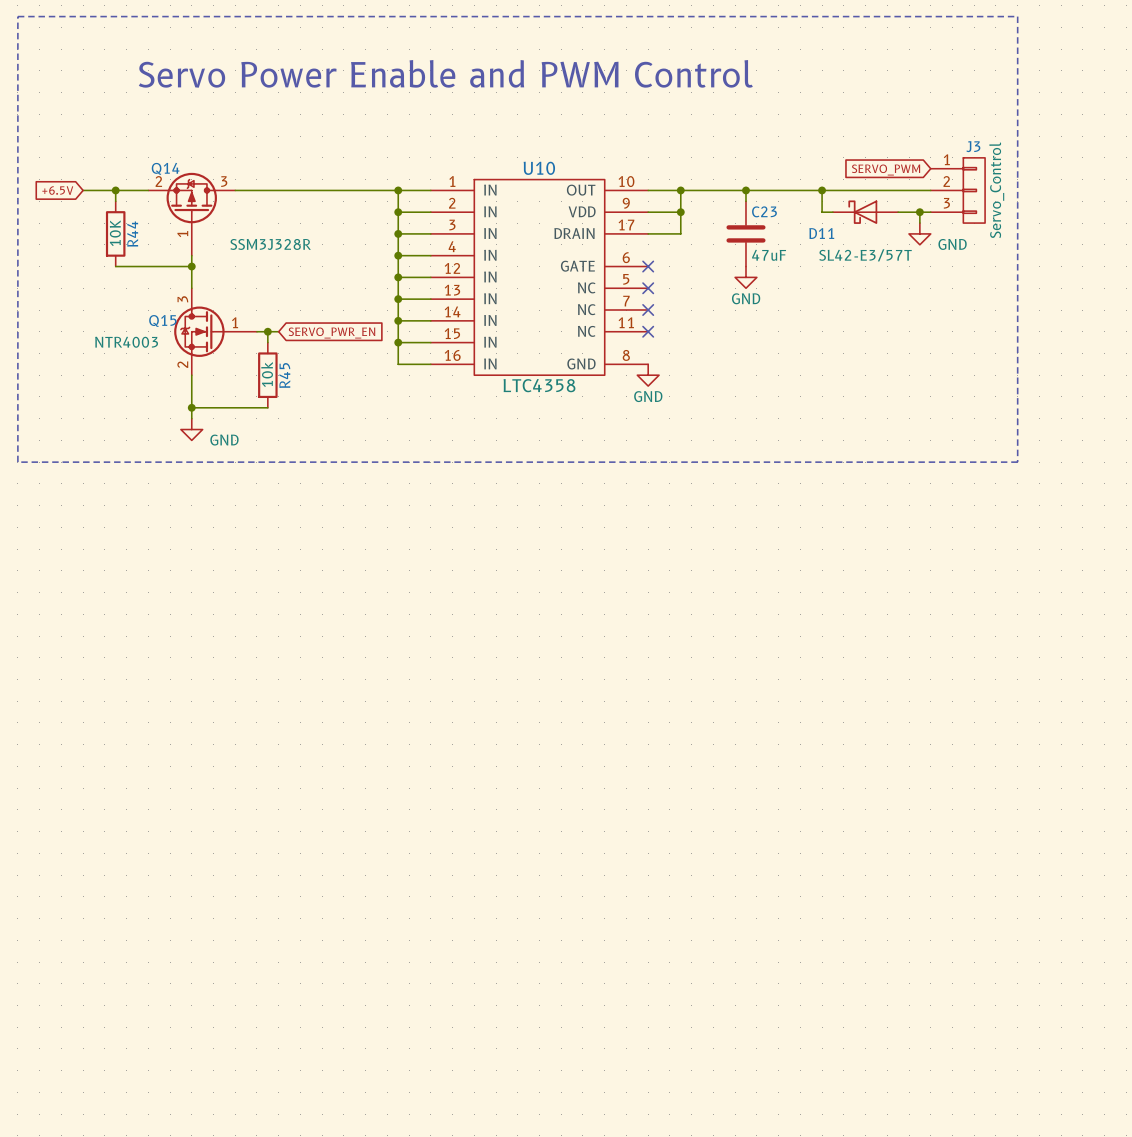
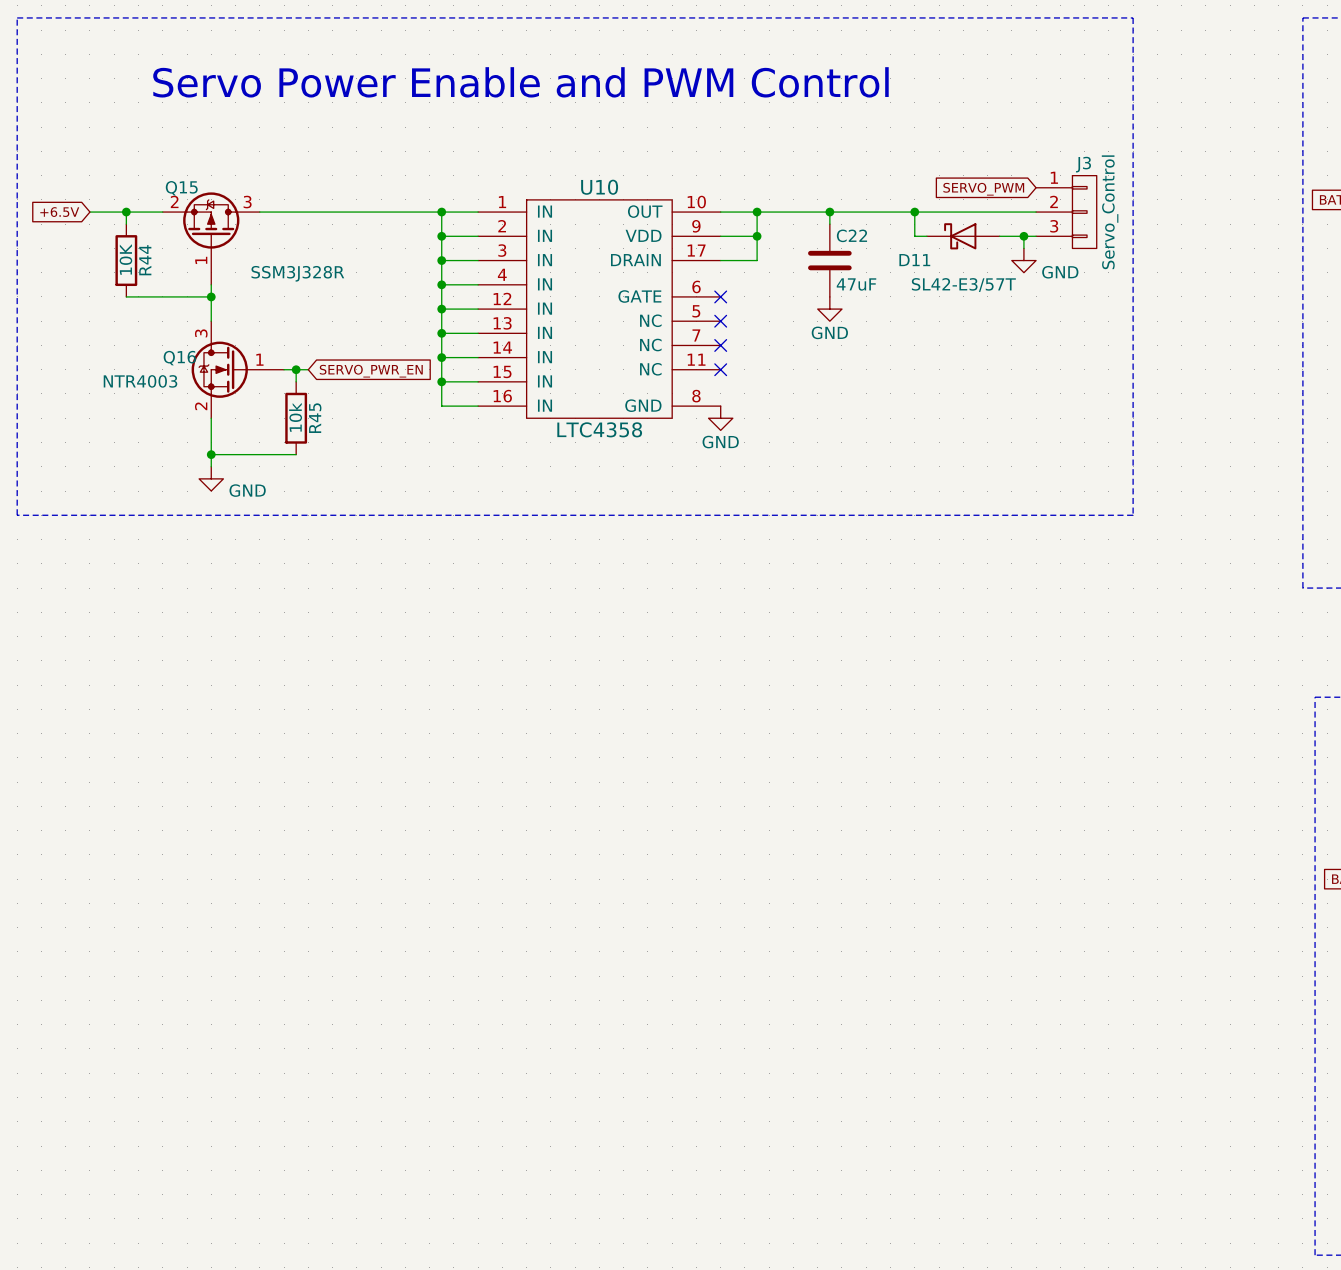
Q14 name: Q14 (165, 168) -> Q15 (181, 188)
C23 name: C23 (764, 211) -> C22 (851, 235)
Q15 name: Q15 (162, 320) -> Q16 (179, 358)

